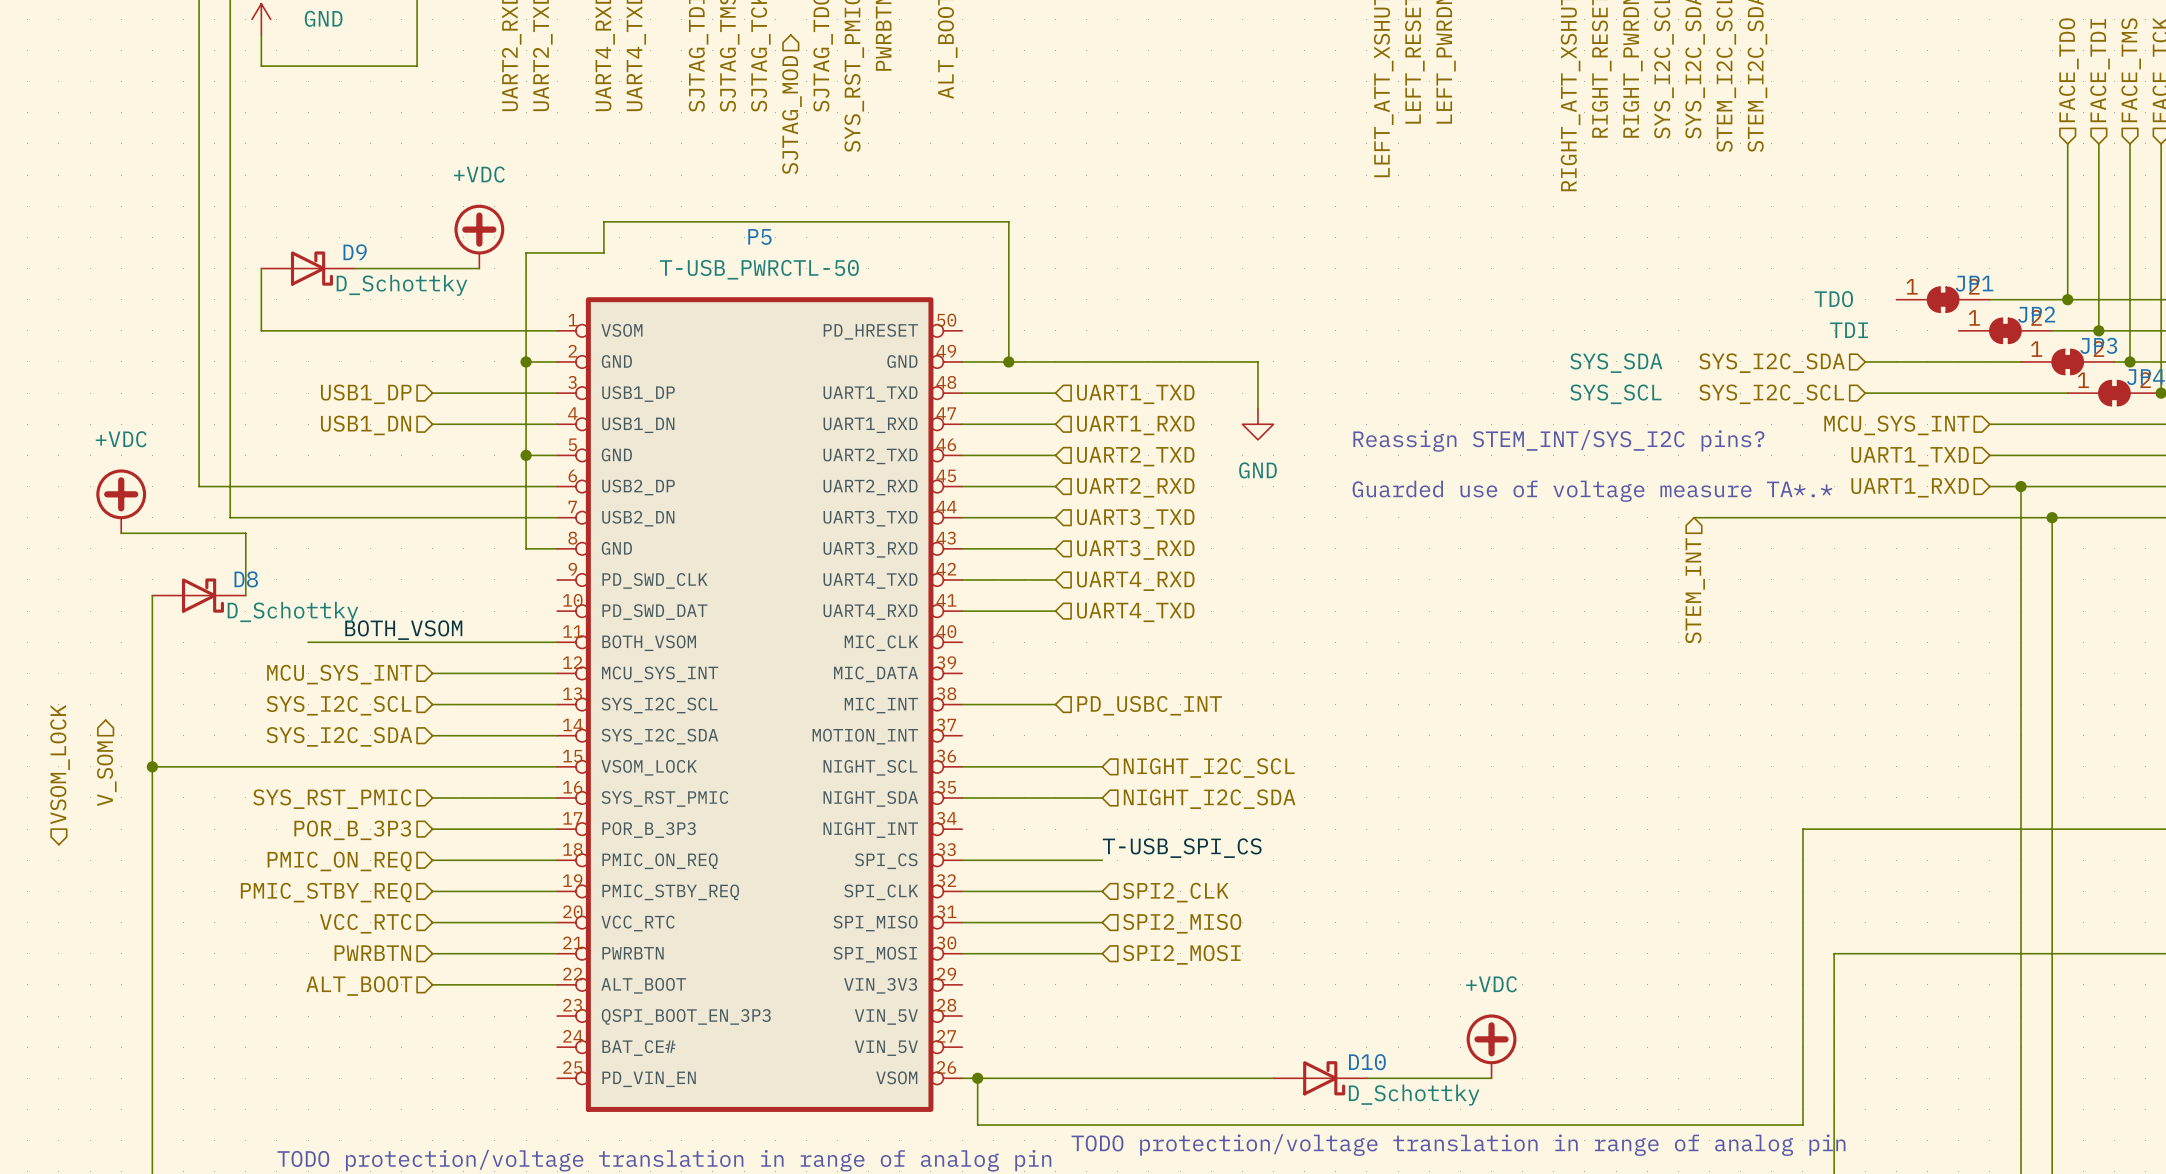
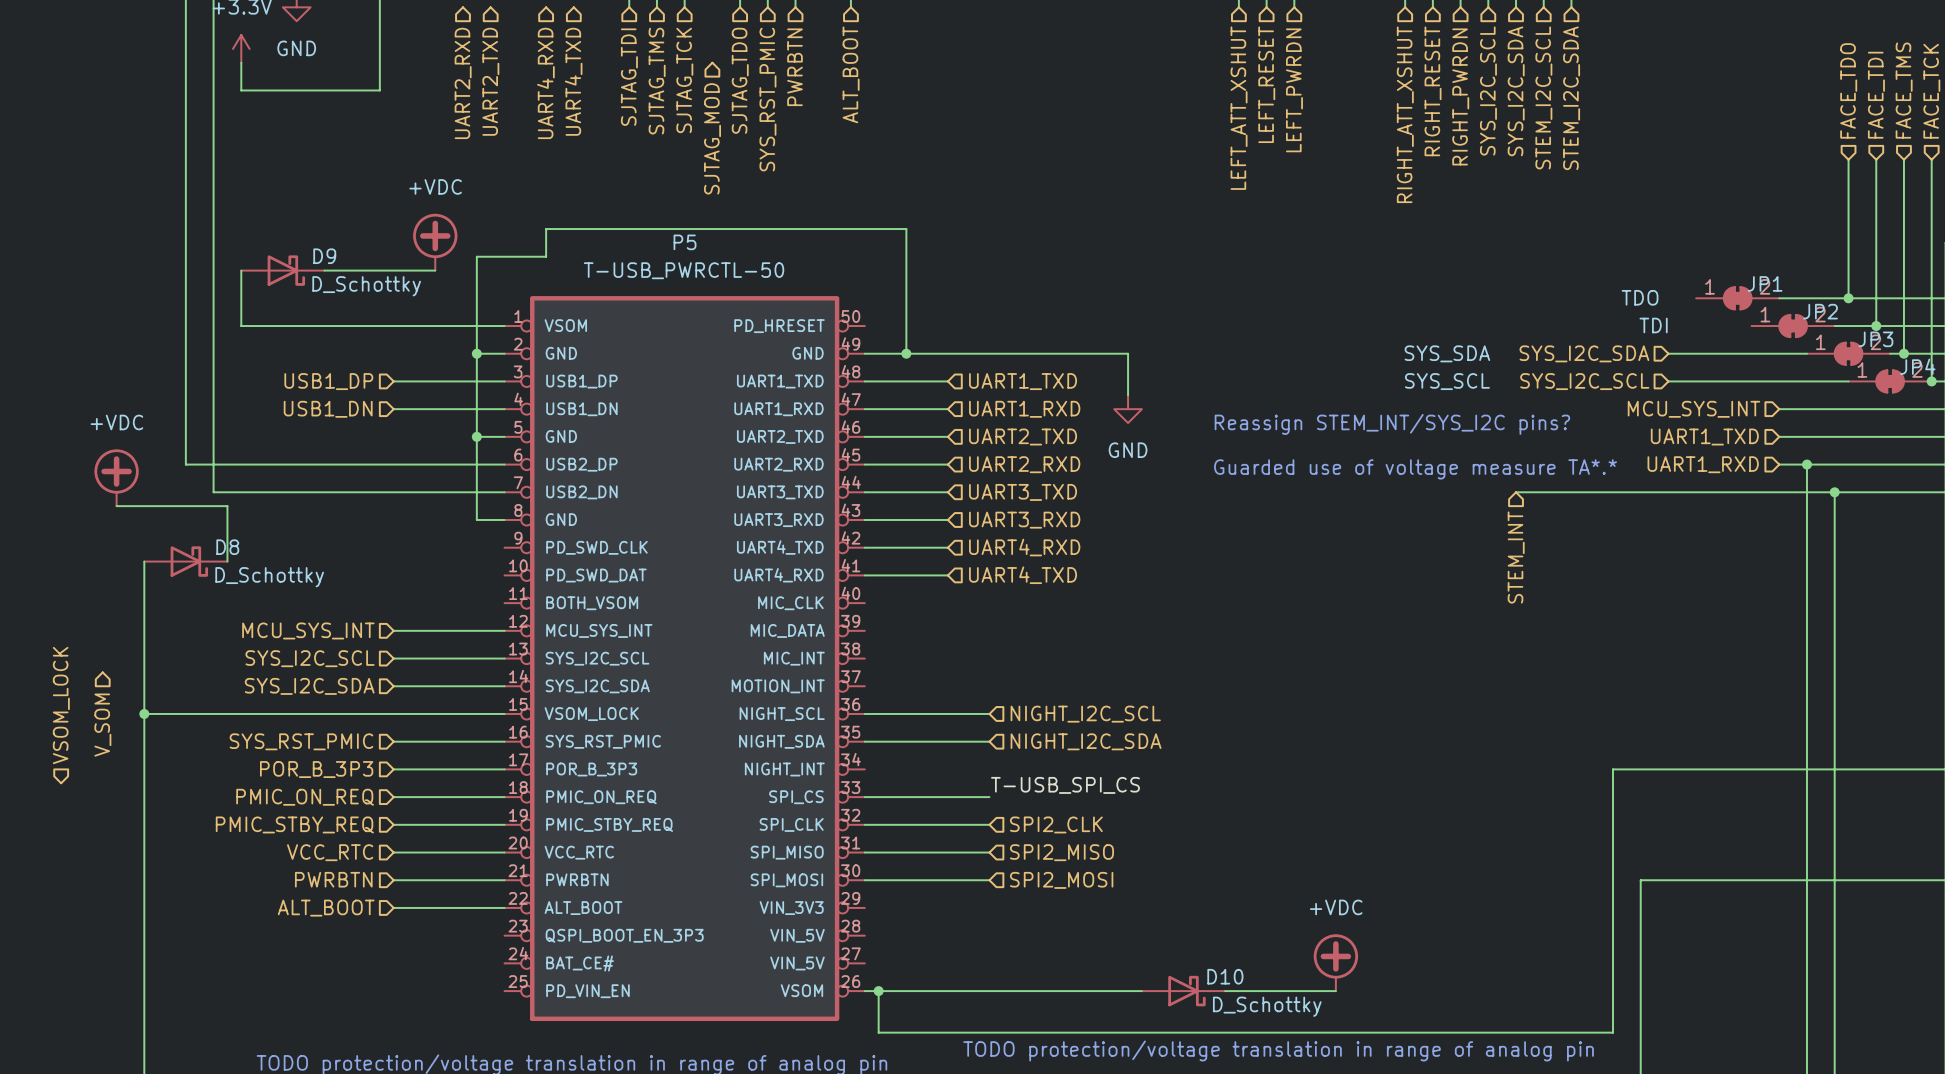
label: BOTH_VSOM (403, 630) -> none
wire: (308, 642) (557, 642) -> none
wire: (962, 704) (1055, 704) -> none
hierarchical label: PD_USBC_INT (1149, 705) -> none

